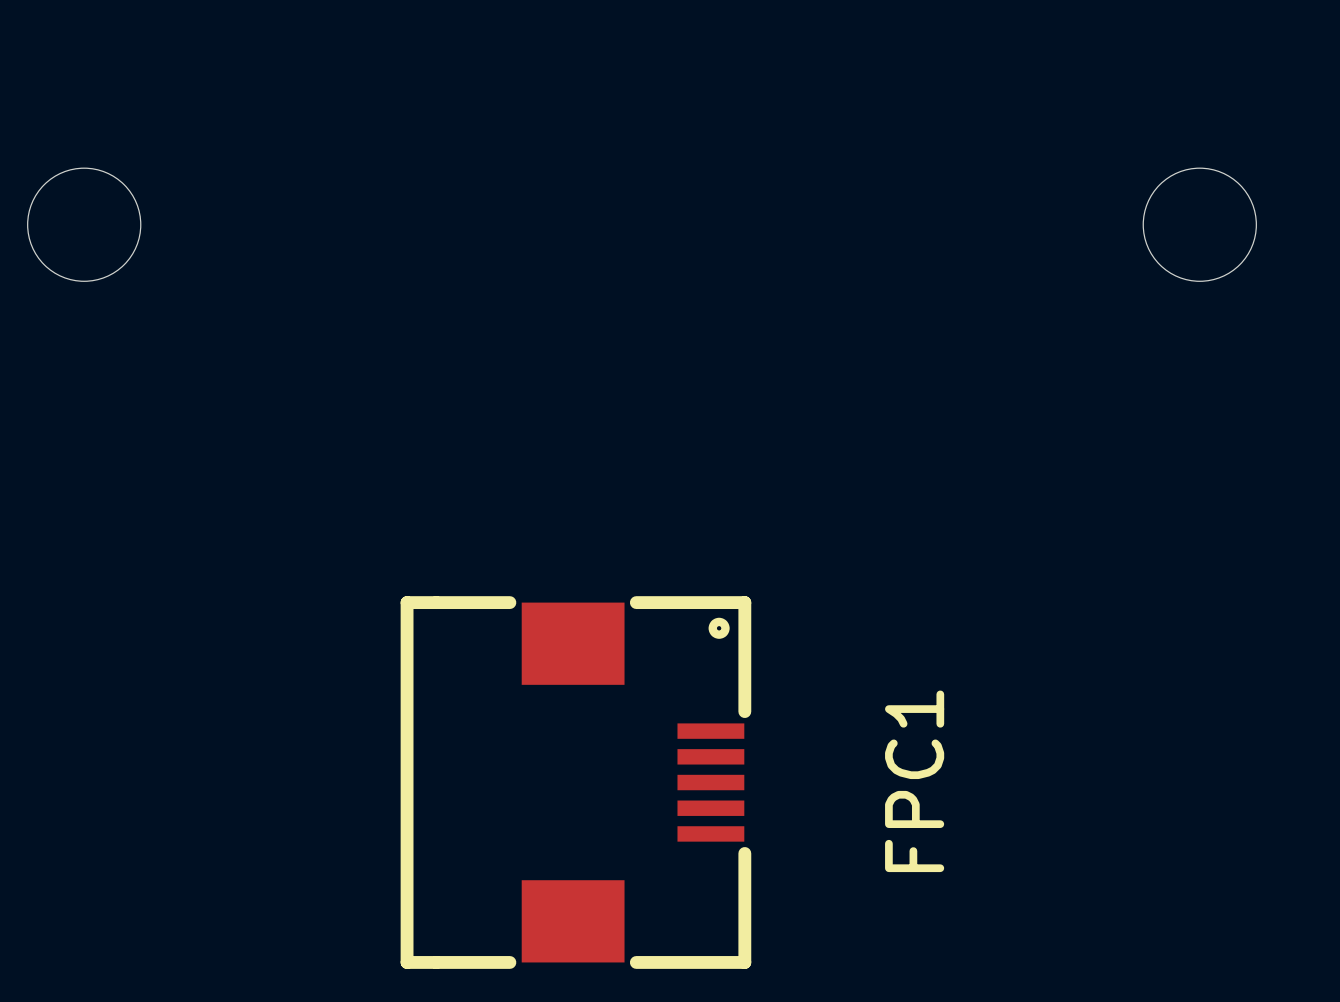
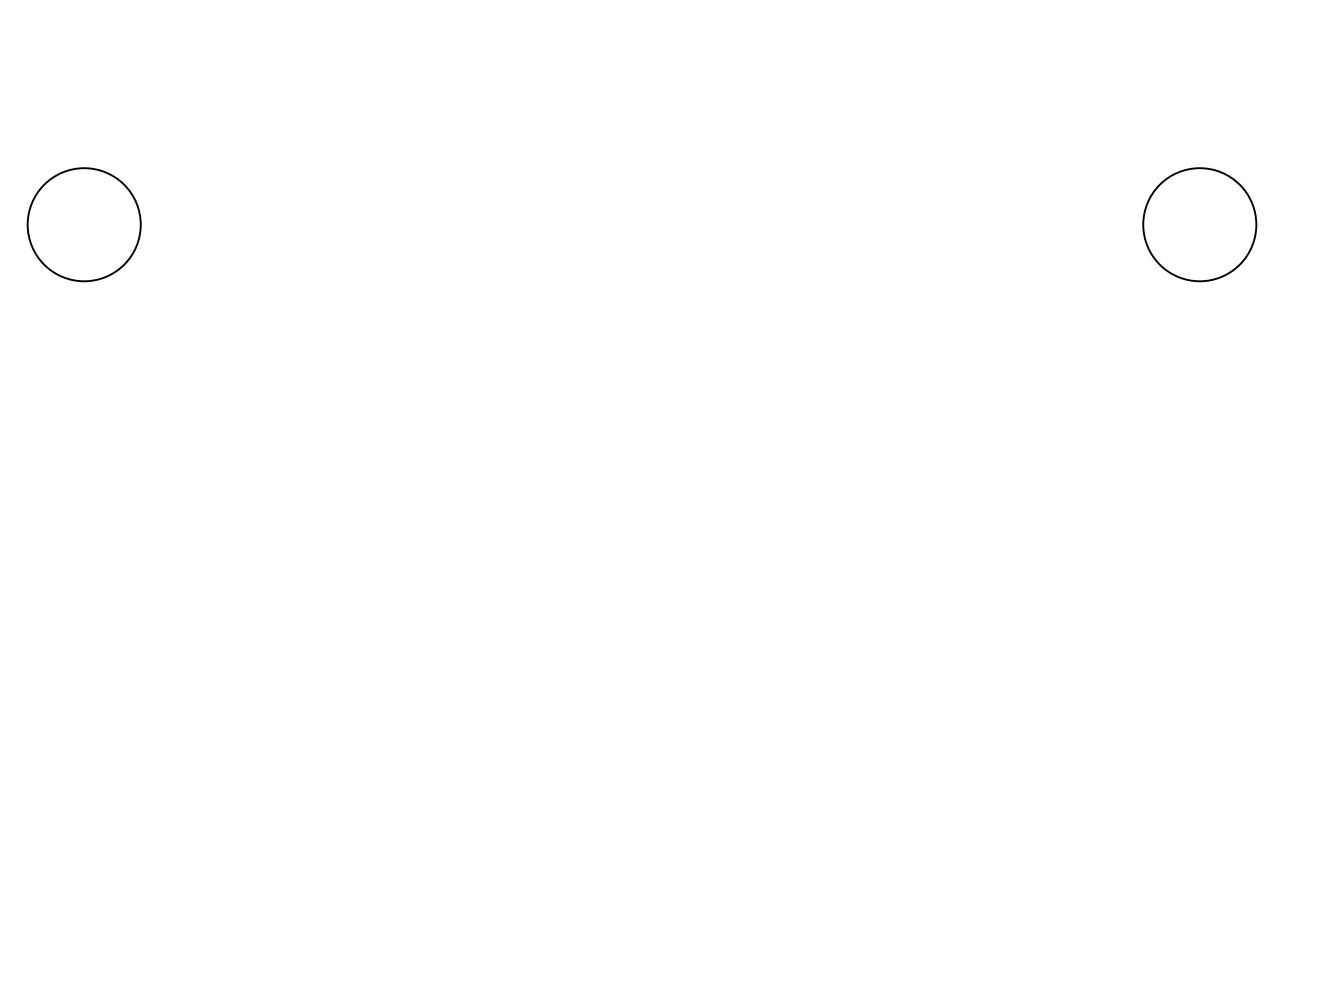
FPC1: (575, 782) -> none

